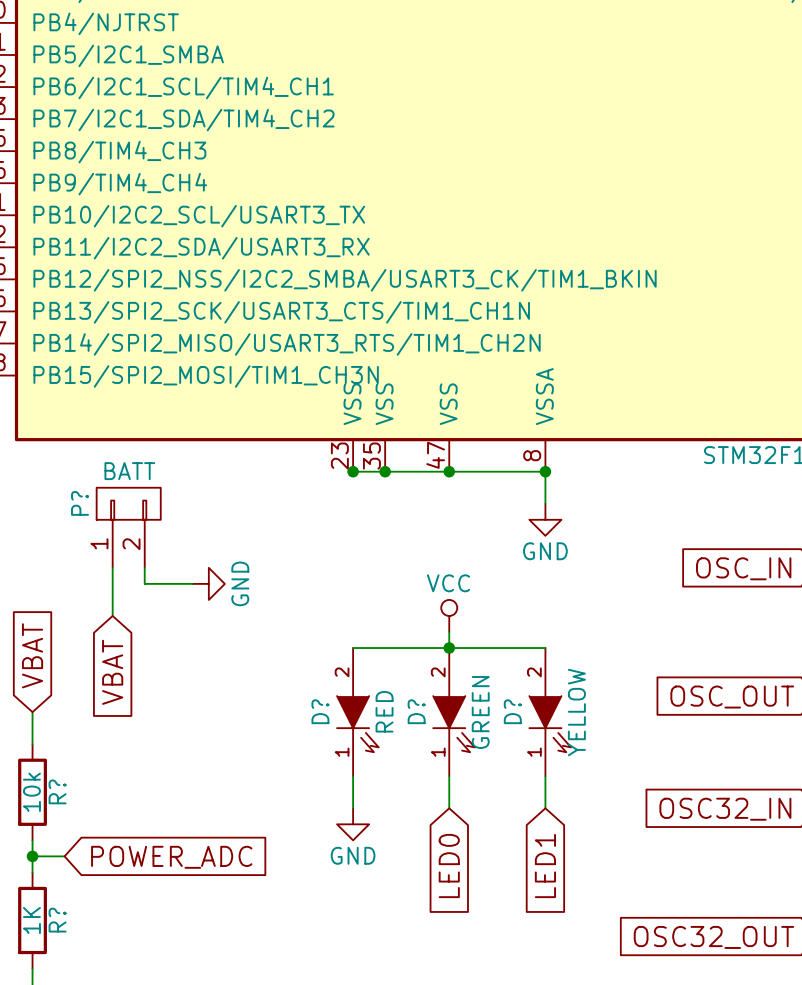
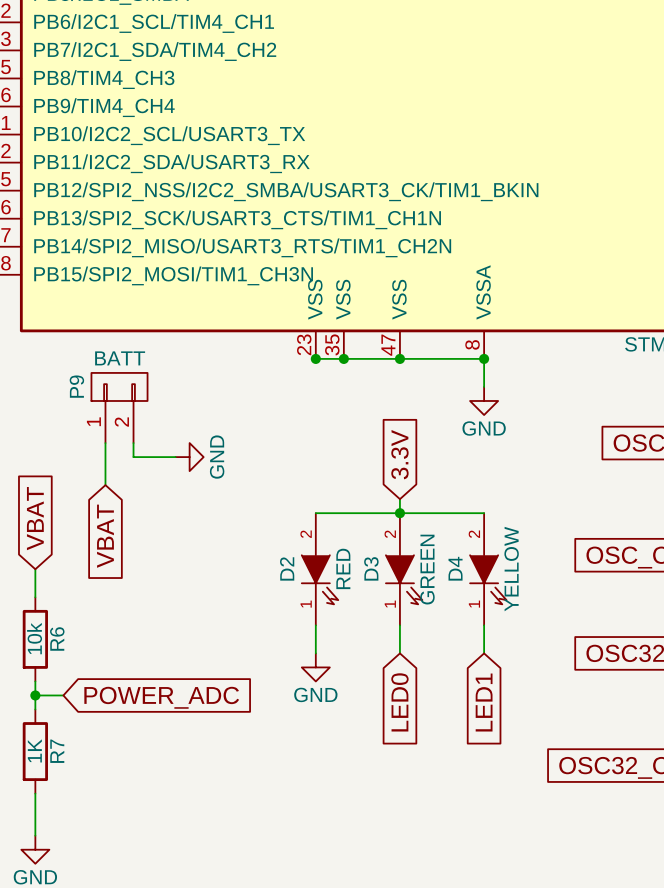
P? name: P? (80, 503) -> P9 (76, 386)
global label: none -> 3.3V (399, 454)
power symbol: VCC (449, 615) -> none
D? name: D? (320, 711) -> D2 (287, 568)
D? name: D? (416, 711) -> D3 (371, 568)
D? name: D? (512, 711) -> D4 (455, 568)
R? name: R? (57, 791) -> R6 (57, 638)
R? name: R? (57, 920) -> R7 (57, 751)

